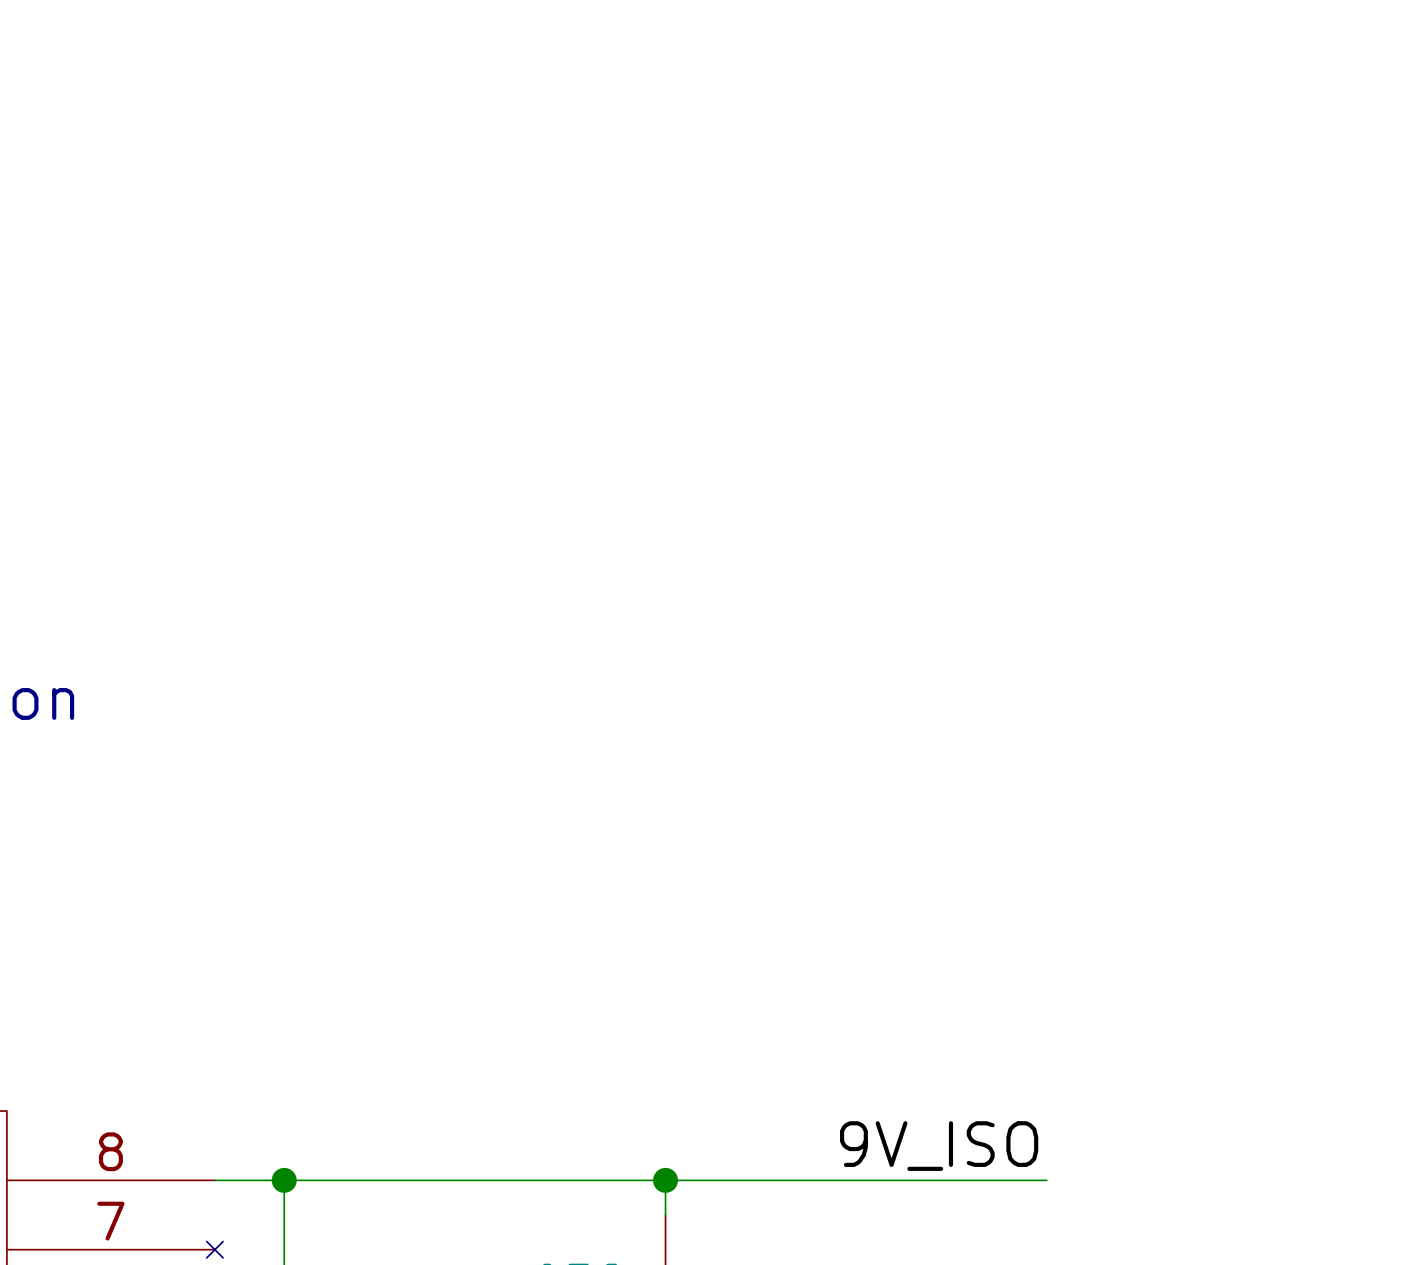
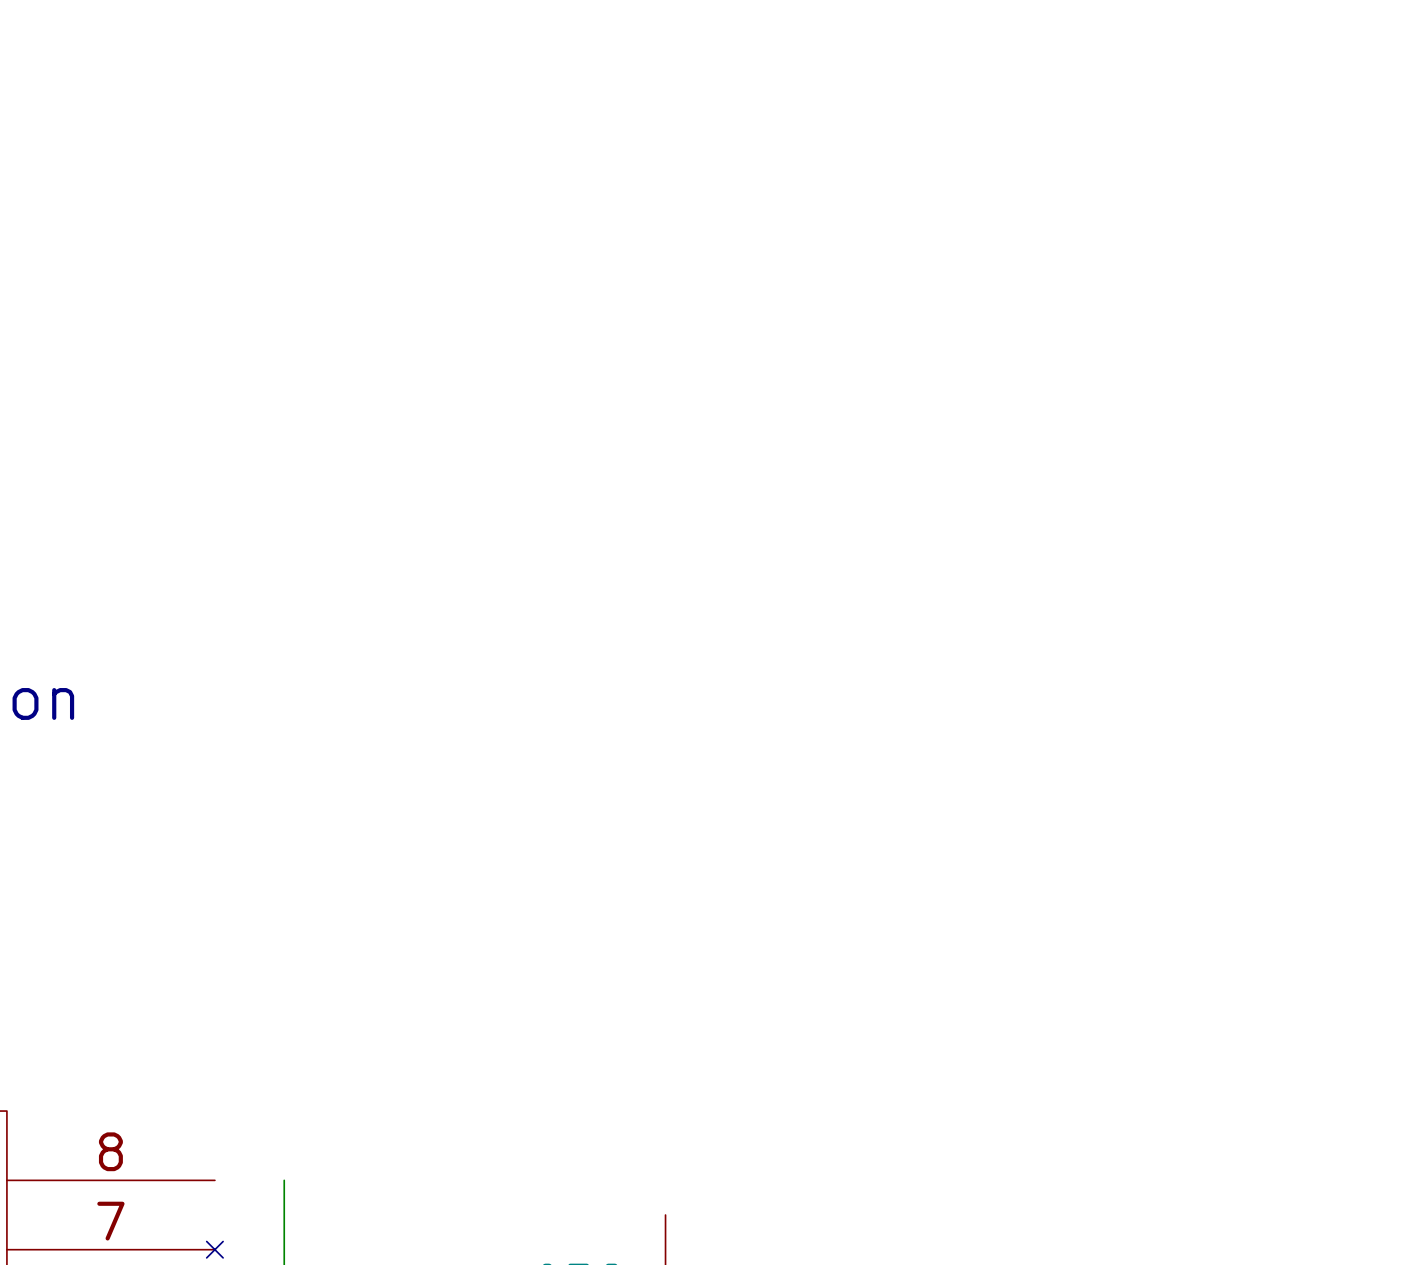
label: 9V_ISO (939, 1146) -> none
wire: (214, 1180) (1046, 1180) -> none
junction: (284, 1180) -> none
wire: (665, 1180) (665, 1215) -> none
junction: (665, 1180) -> none

